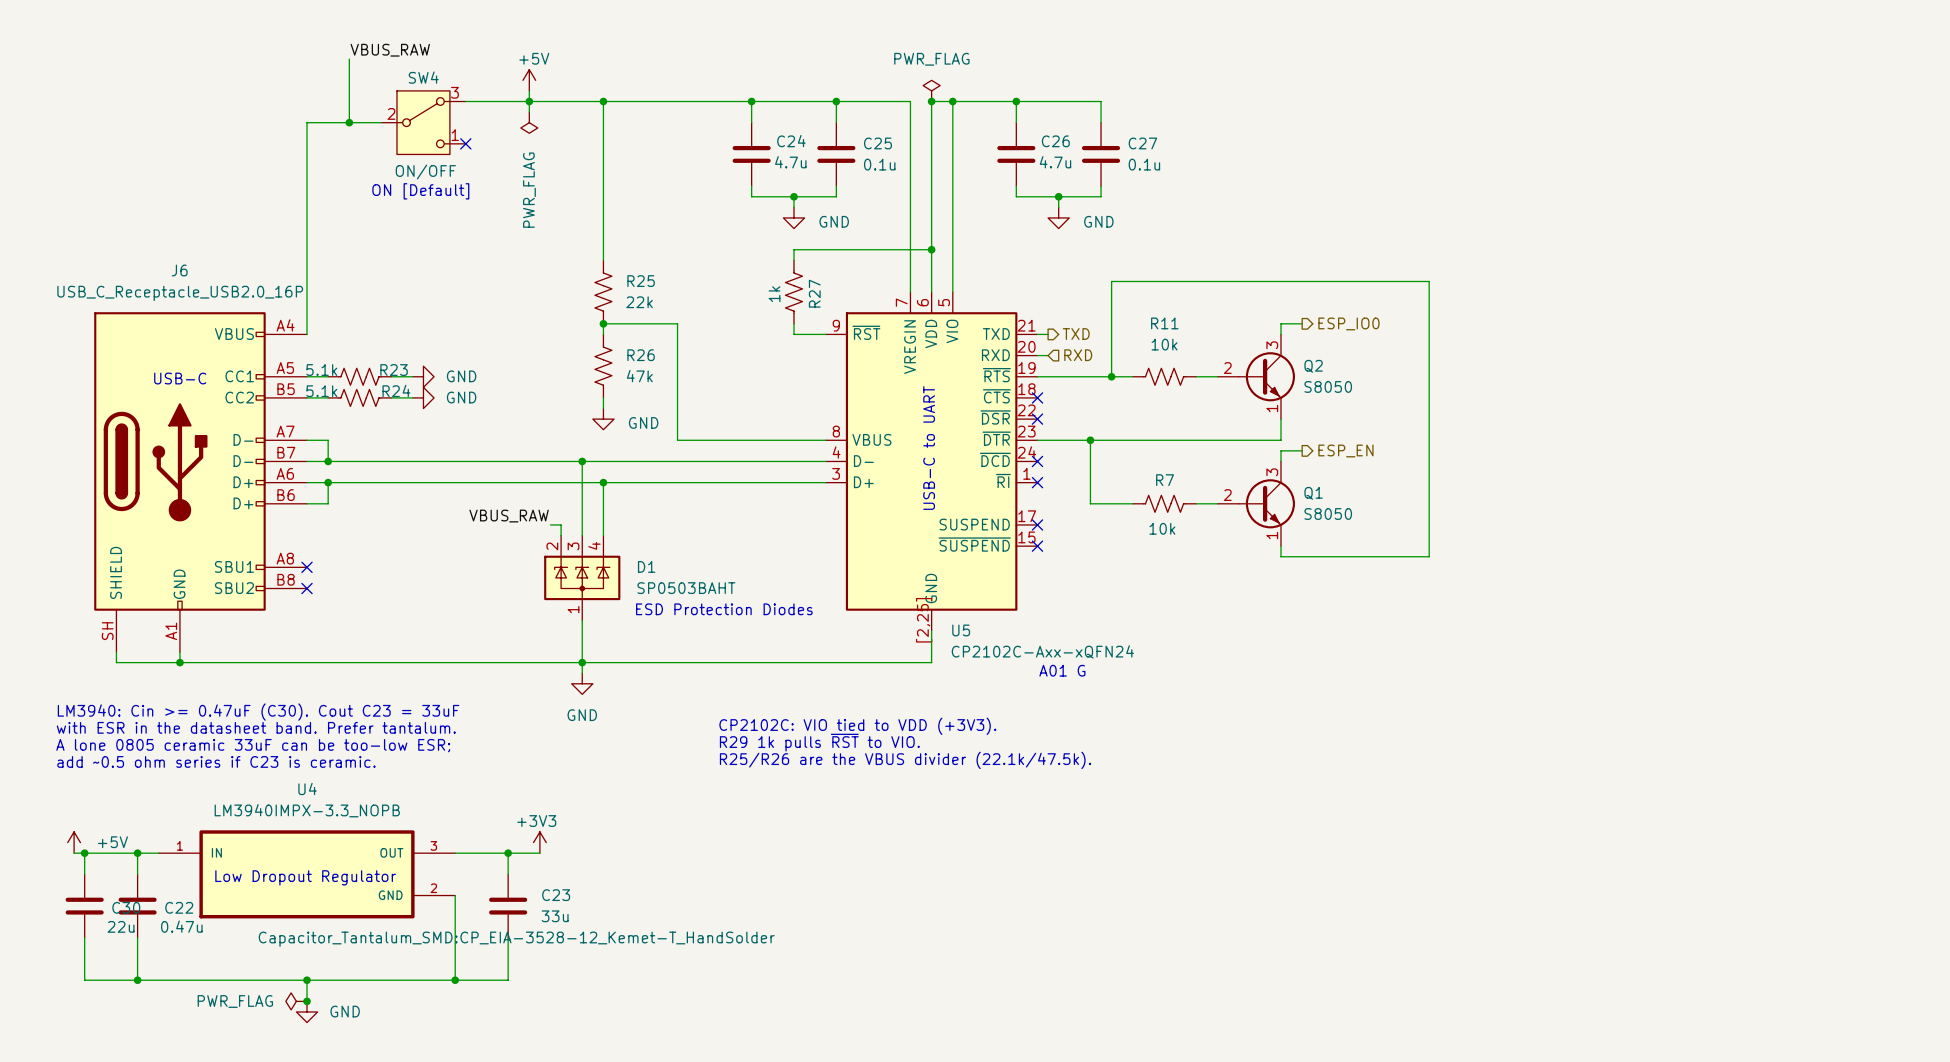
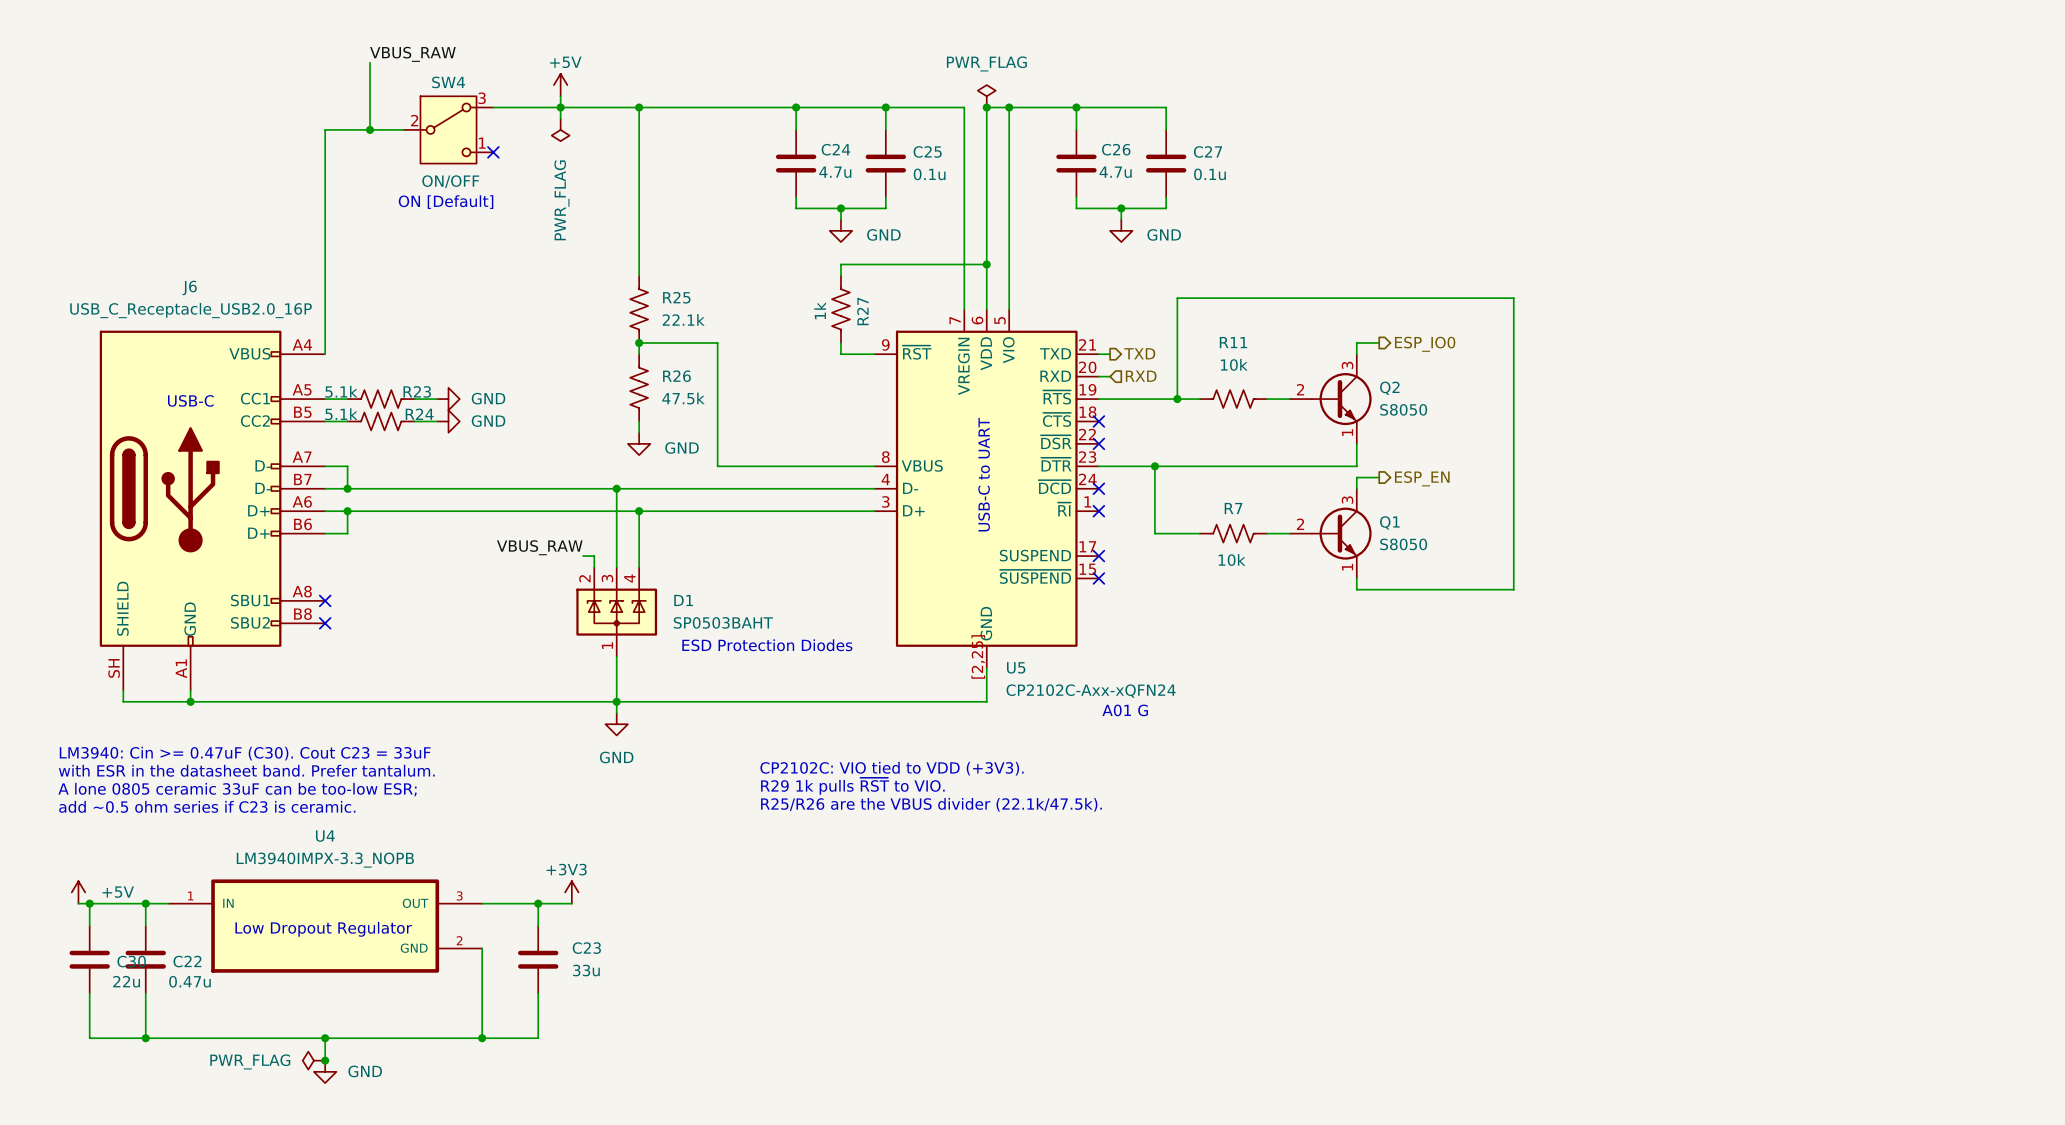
R25 value: 22k (639, 302) -> 22.1k (683, 319)
R26 value: 47k (639, 376) -> 47.5k (683, 398)
C23 text: Capacitor_Tantalum_SMD:CP_EIA-3528-12_Kemet-T_HandSolder (516, 939) -> none

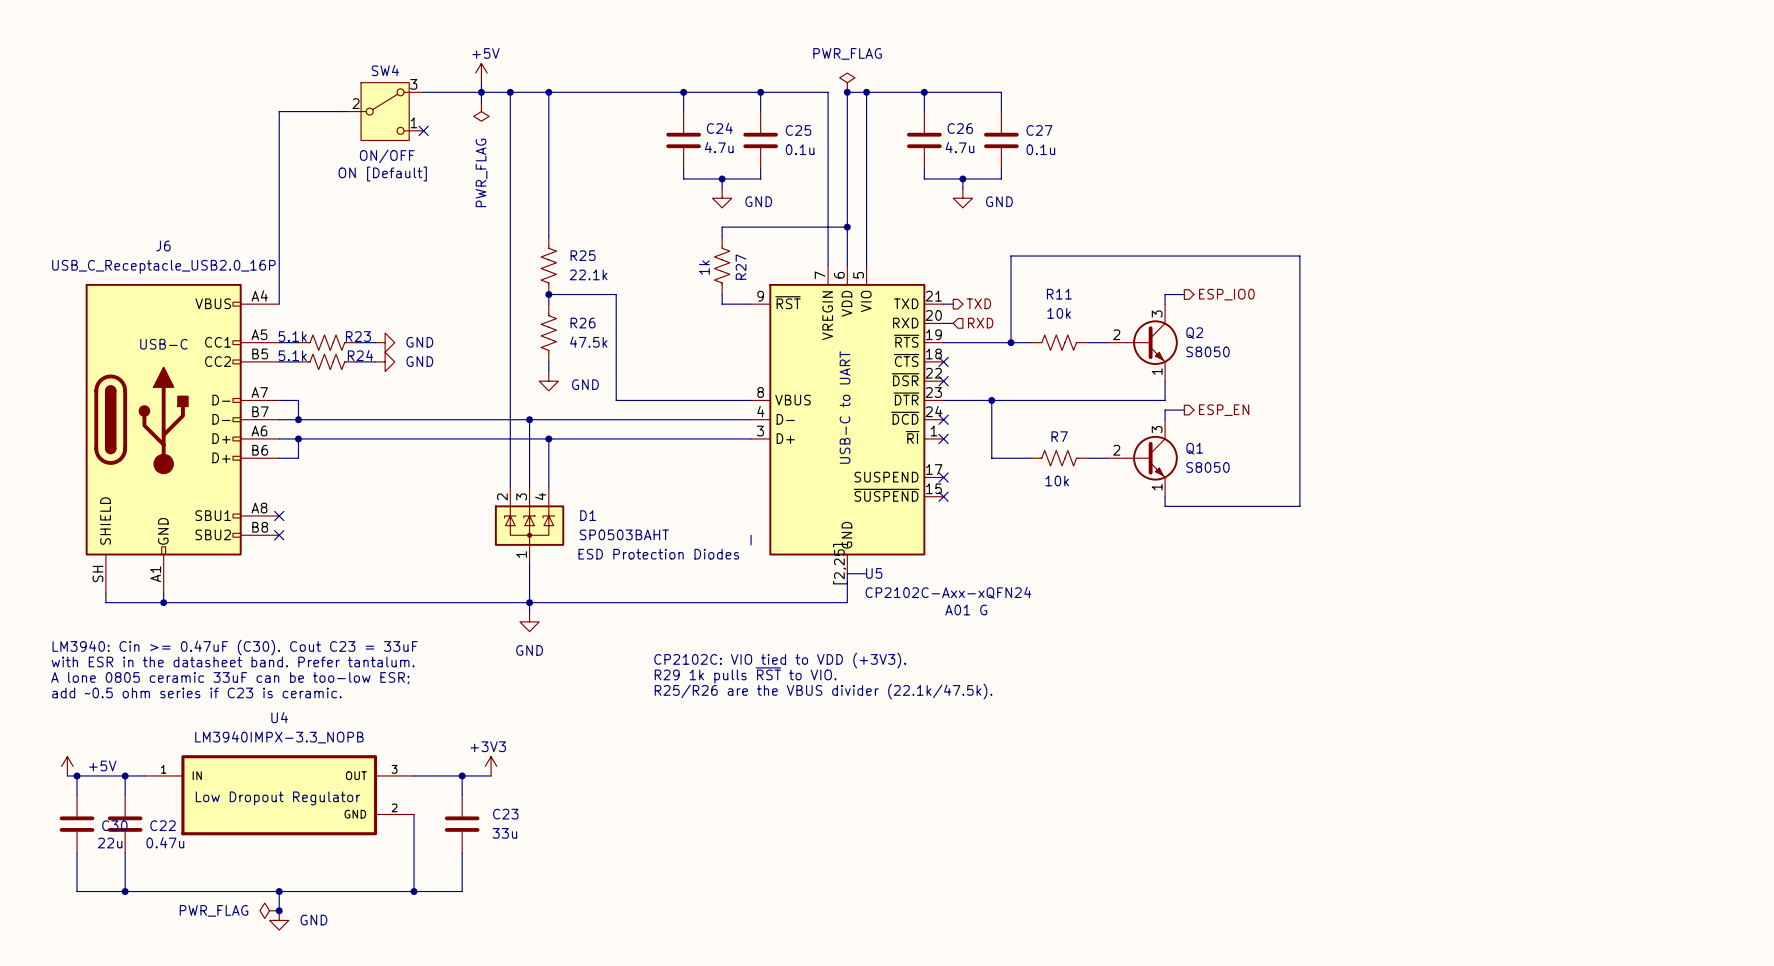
label: VBUS_RAW (412, 54) -> none
wire: (370, 62) (370, 129) -> none
junction: none -> (510, 92)
junction: (370, 129) -> none
label: VBUS_RAW (539, 547) -> none
wire: (583, 556) (594, 556) -> (510, 92) (510, 477)
wire: none -> (751, 535) (751, 544)
wire: none -> (847, 573) (866, 573)

